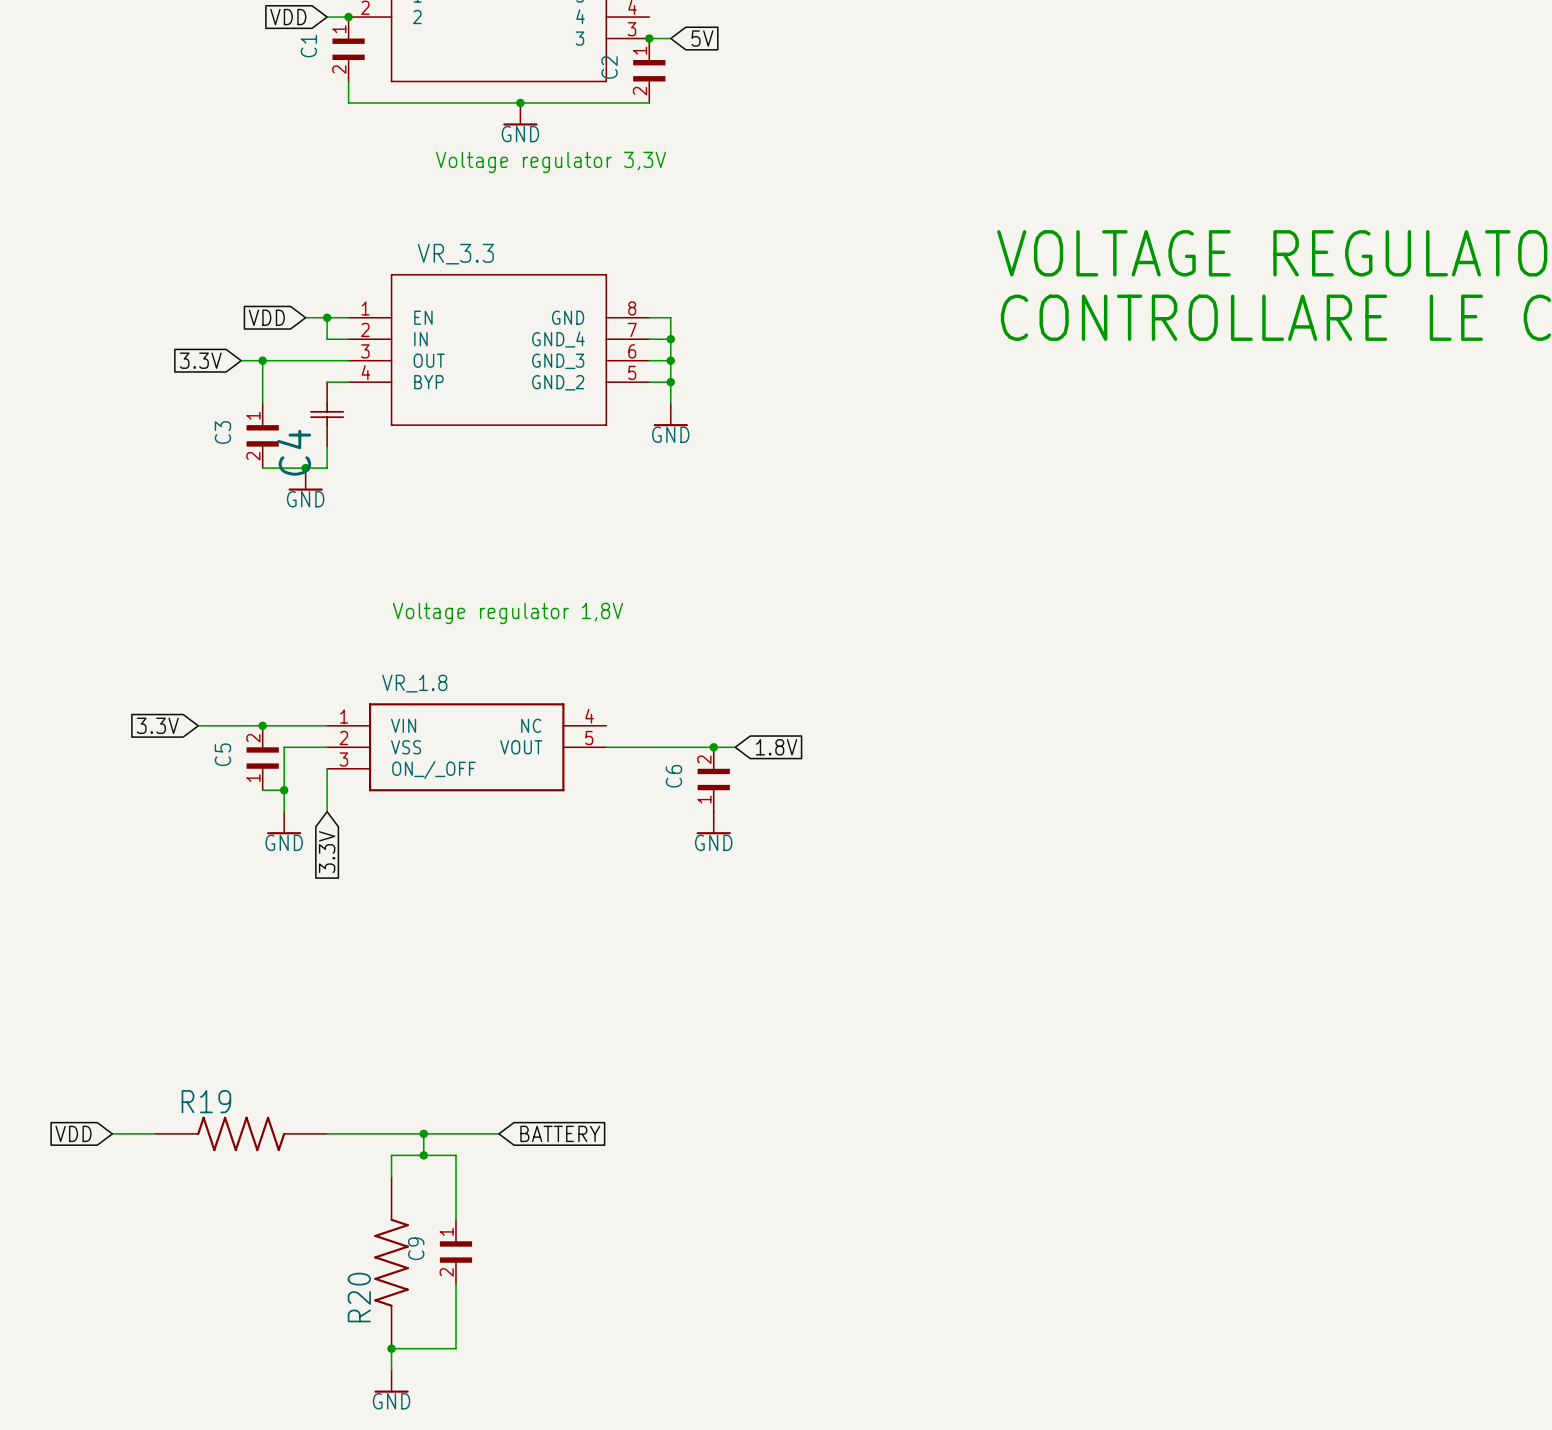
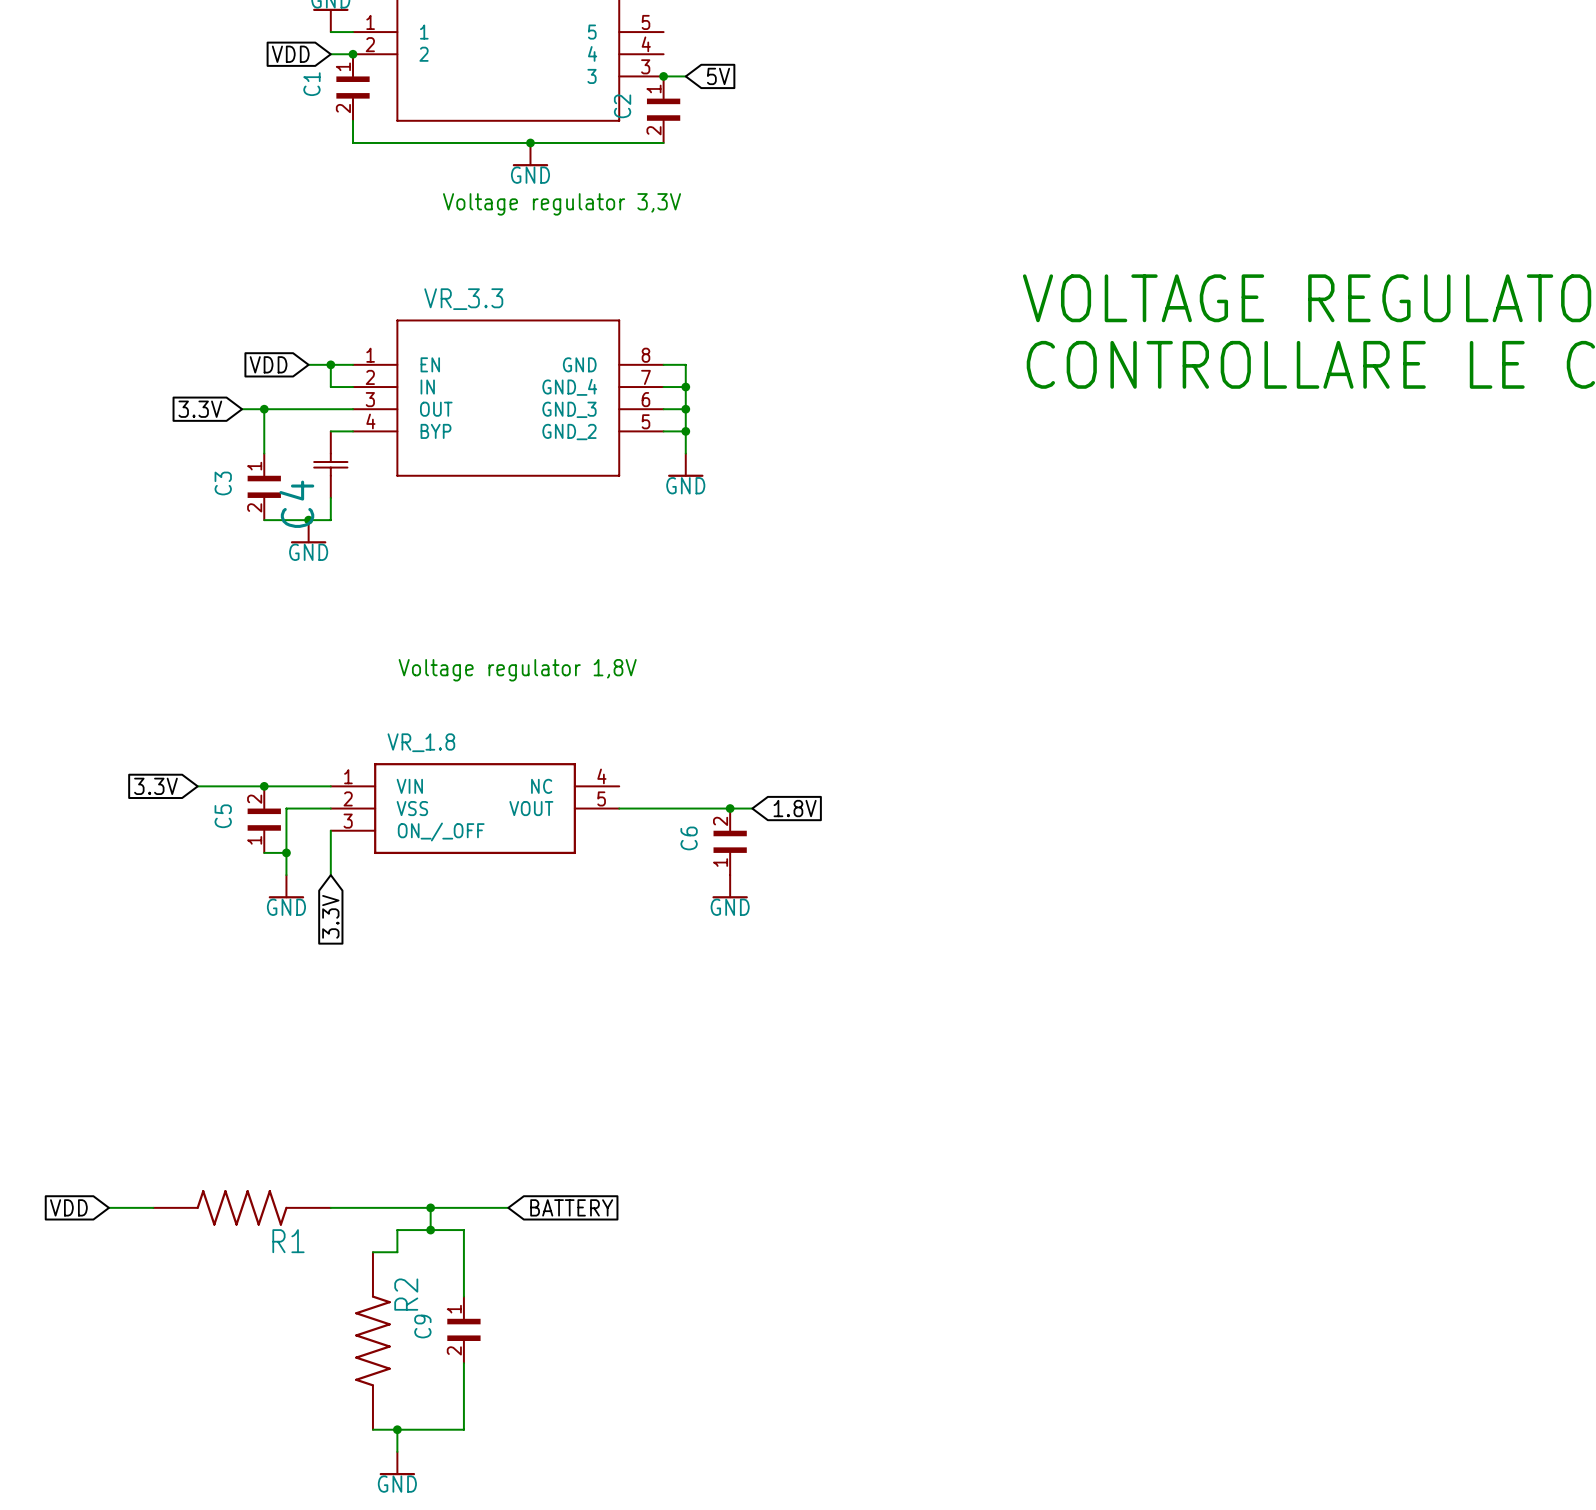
R19 name: R19 (206, 1101) -> R1 (288, 1241)
wire: none -> (372, 1252) (397, 1252)
R2: none -> (372, 1340)
R20: (391, 1262) -> none
wire: none -> (372, 1429) (397, 1429)

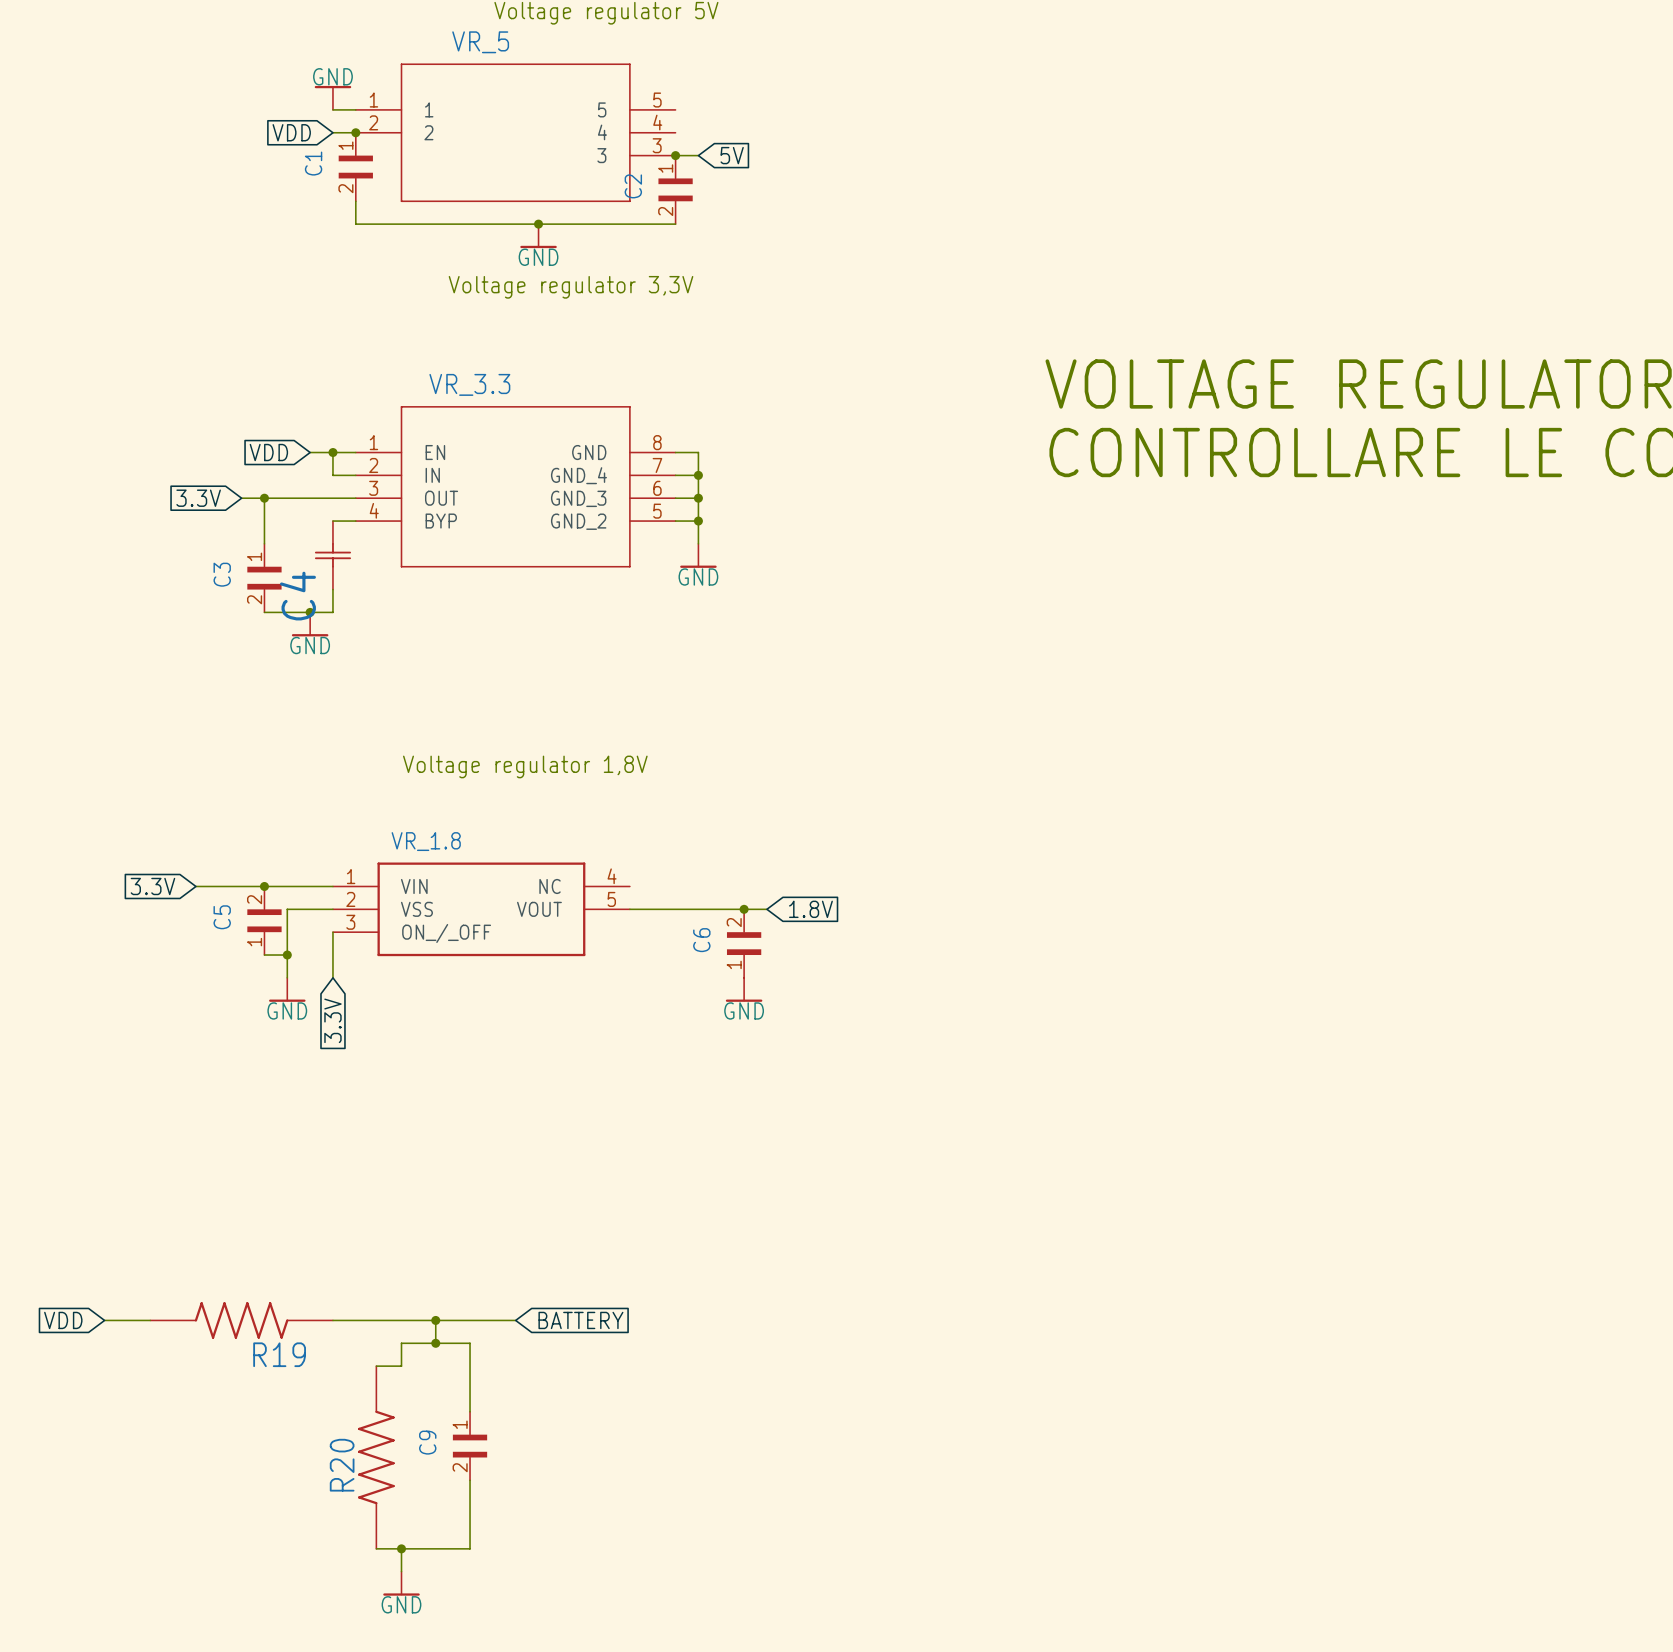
R1 name: R1 (288, 1241) -> R19 (279, 1354)
R2 name: R2 (406, 1294) -> R20 (342, 1465)

